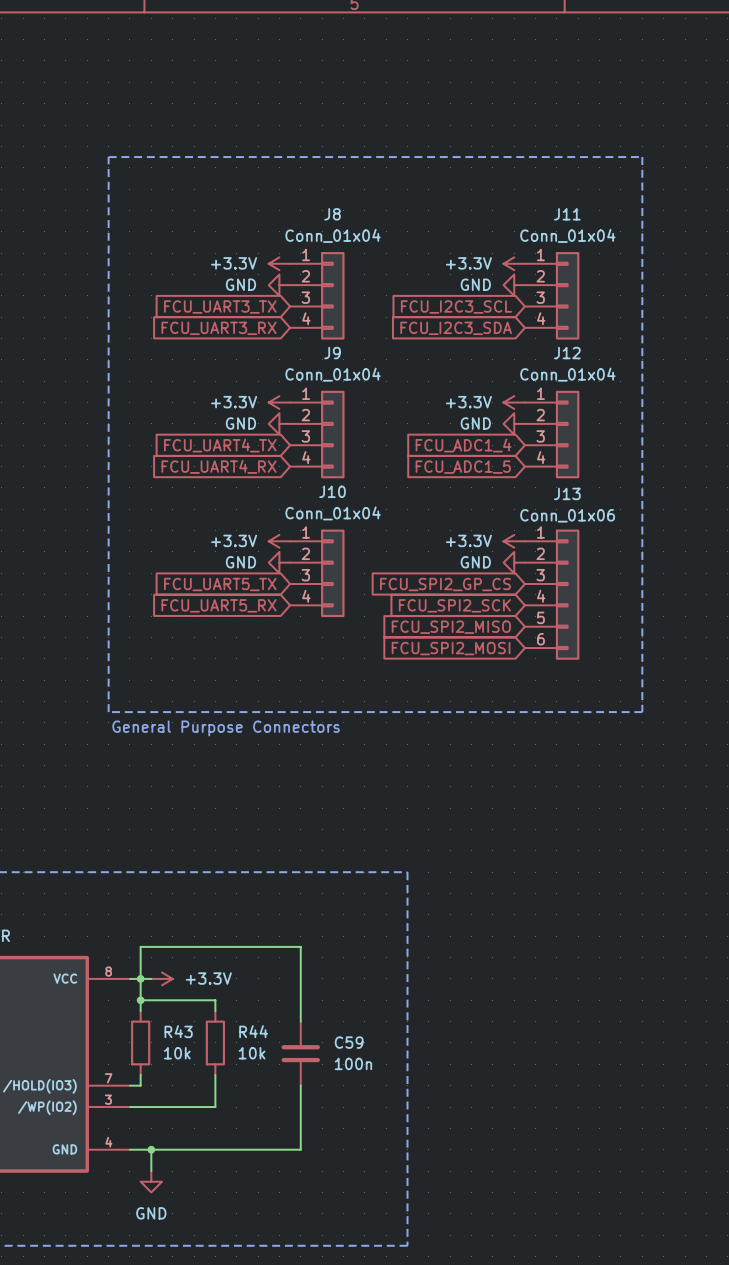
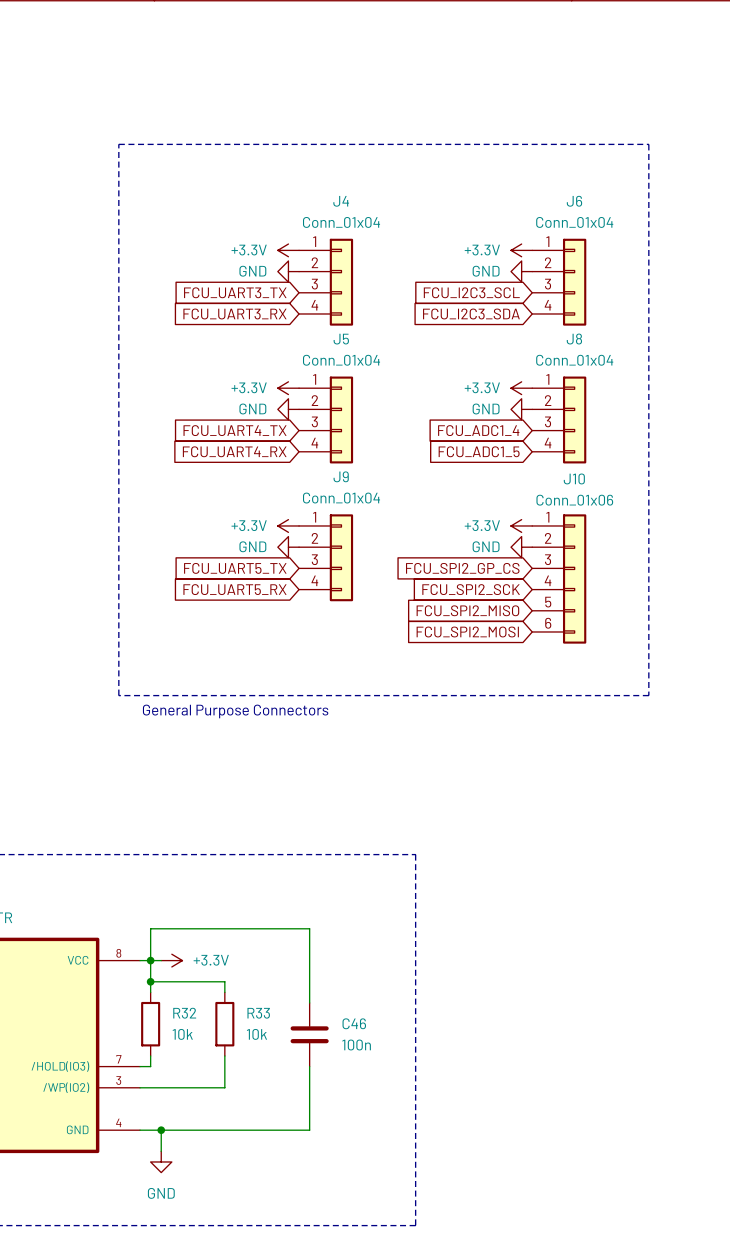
J8 name: J8 (332, 214) -> J4 (341, 201)
J11 name: J11 (567, 214) -> J6 (574, 201)
J9 name: J9 (332, 353) -> J5 (341, 339)
J12 name: J12 (567, 353) -> J8 (574, 339)
J10 name: J10 (332, 491) -> J9 (341, 476)
J13 name: J13 (567, 493) -> J10 (574, 478)
R43 name: R43 (178, 1031) -> R32 (184, 1013)
R44 name: R44 (253, 1031) -> R33 (258, 1013)
C59 name: C59 (349, 1042) -> C46 (354, 1023)

